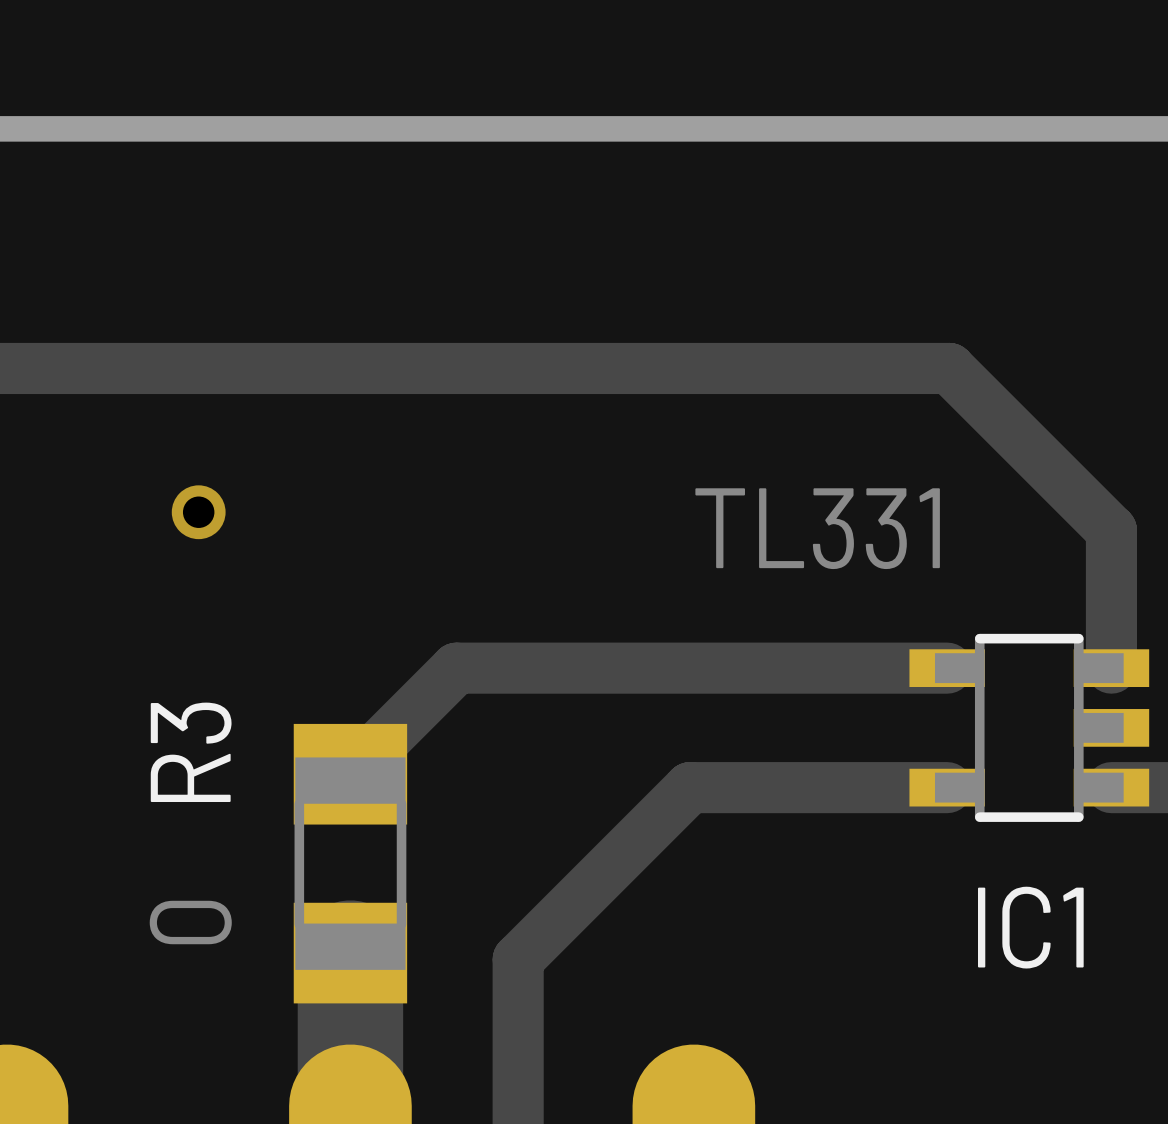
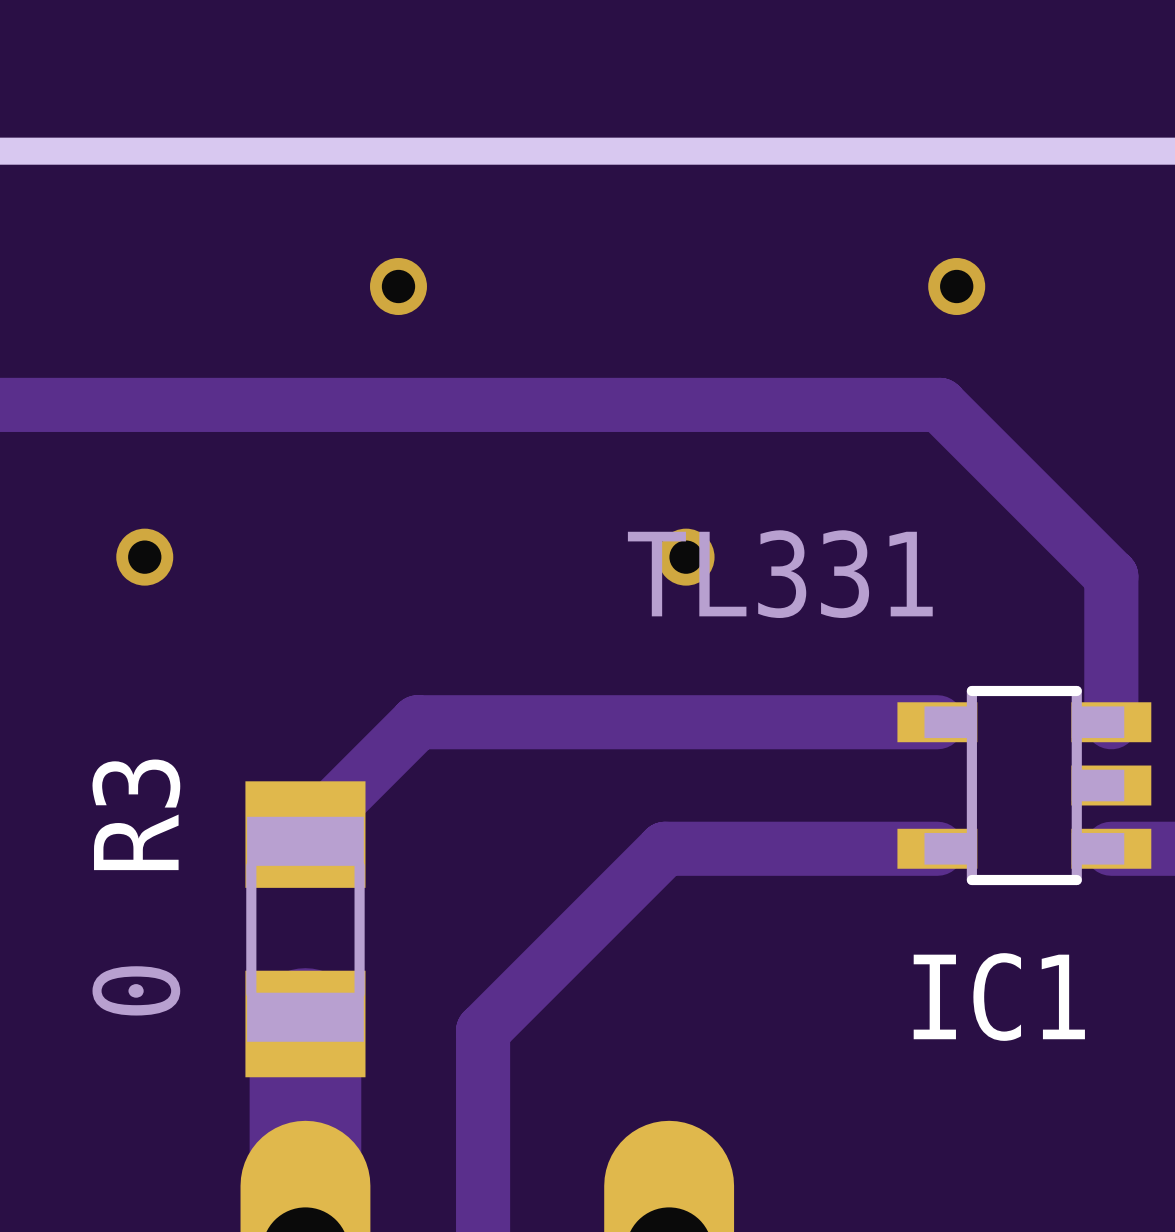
via: none -> (398, 286)
via: none -> (956, 286)
via: none -> (686, 557)

